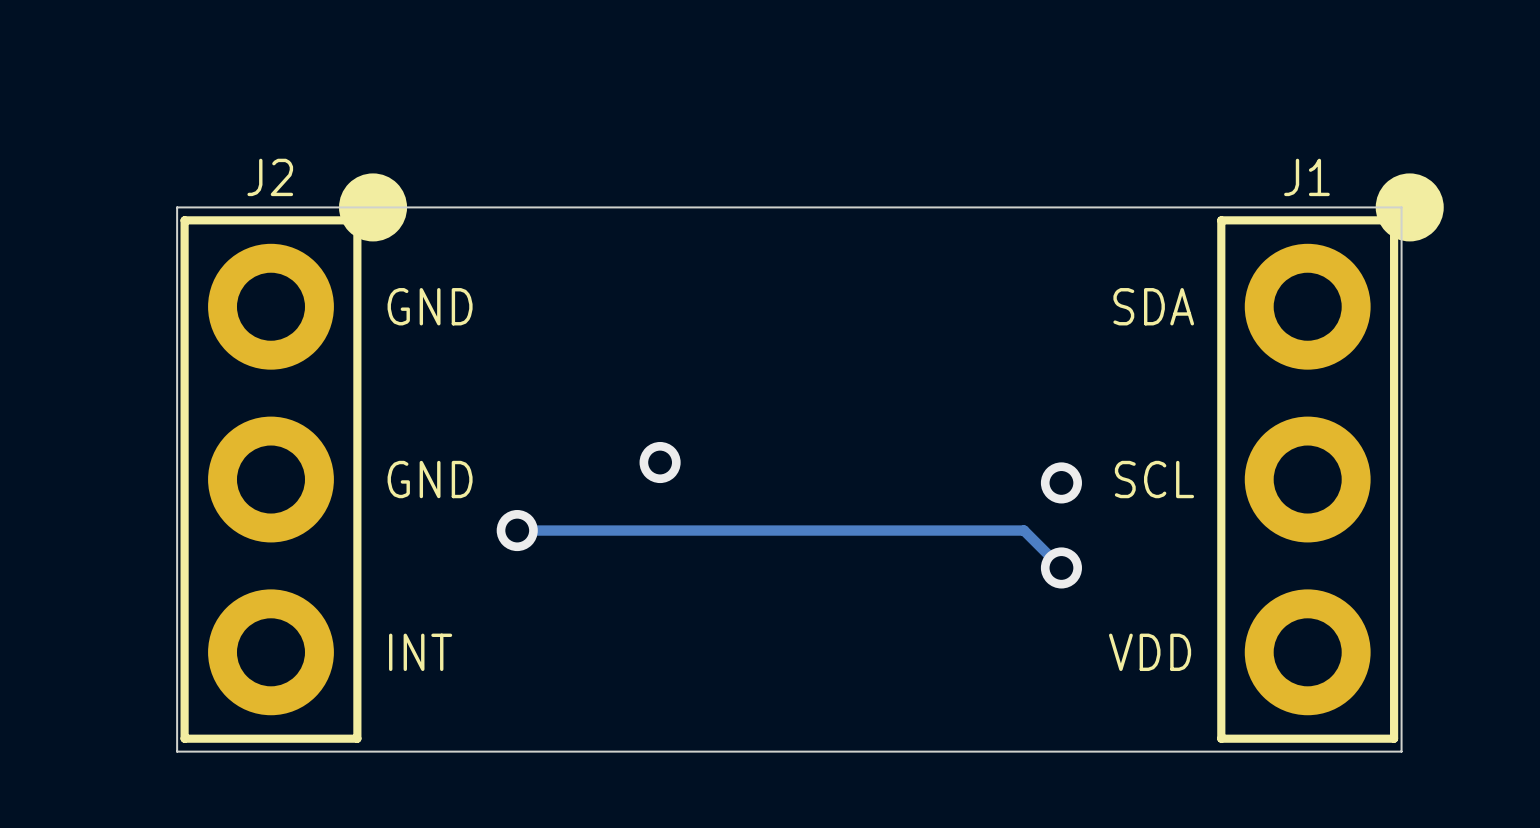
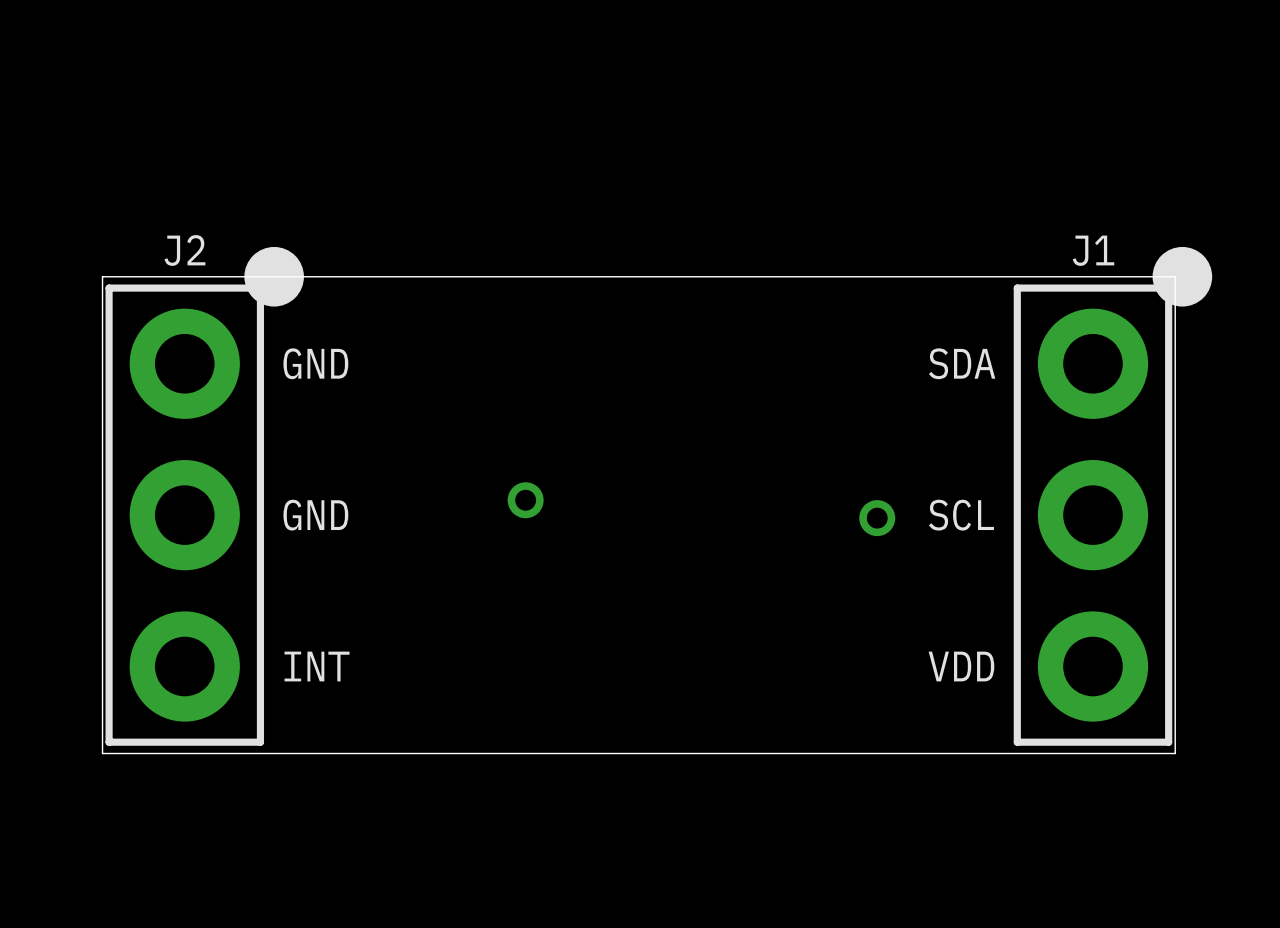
track: (517, 530) (1024, 530) (1061, 567) -> none
via: (517, 530) -> none
via: (1061, 567) -> none

